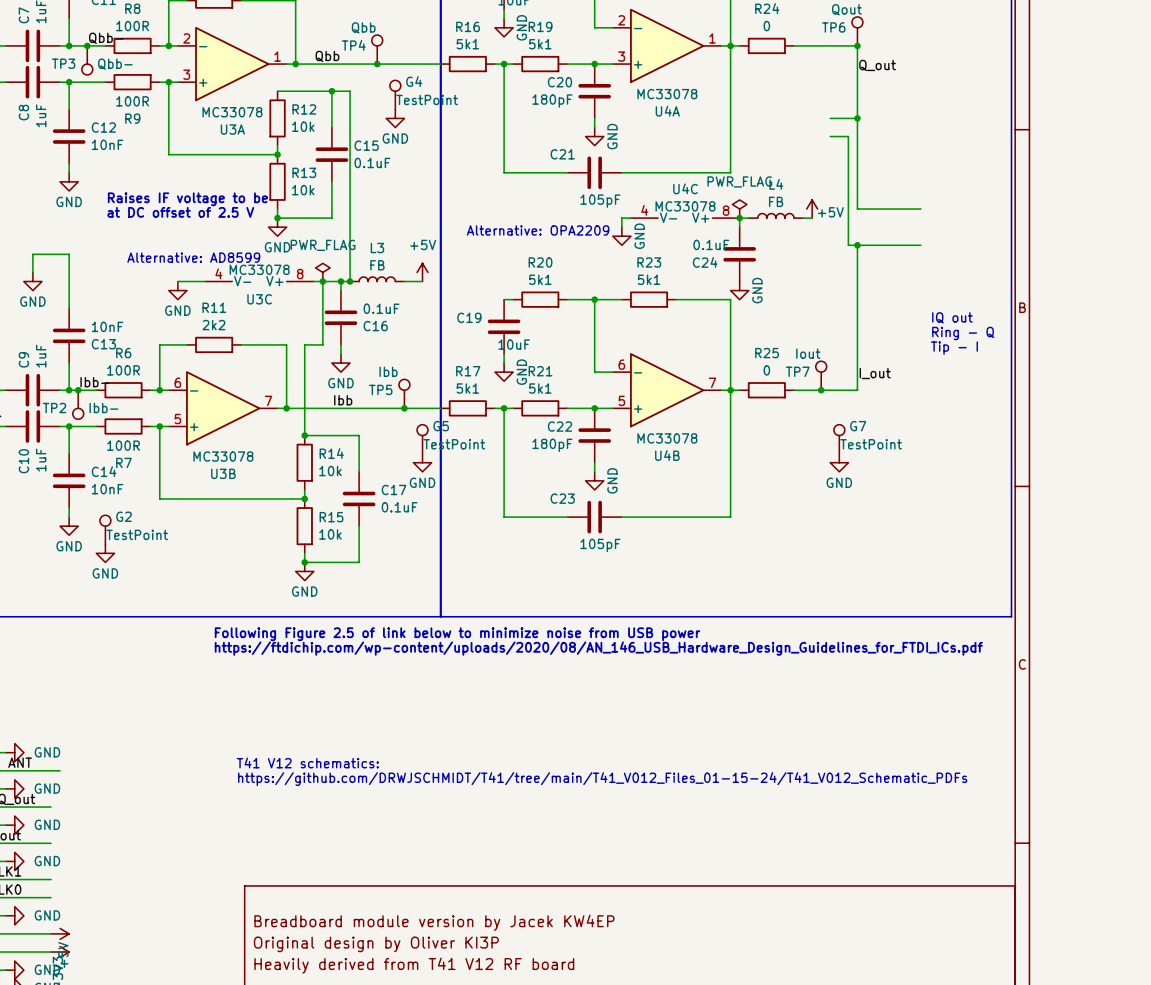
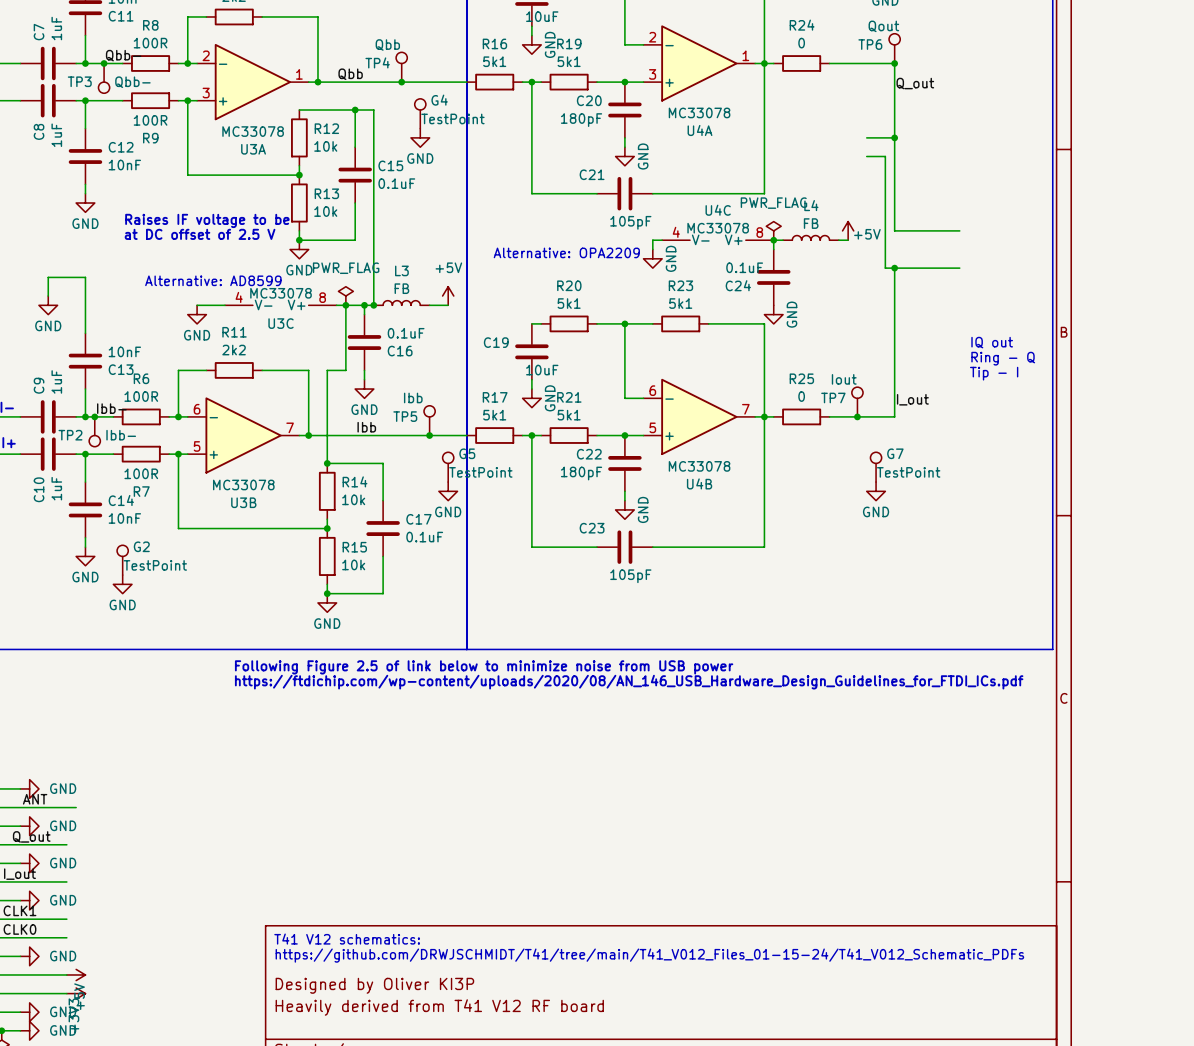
text position: T41 V12 schematics: (307, 762) -> T41 V12 schematics: (347, 939)
text position: https://github.com/DRWJSCHMIDT/T41/tree/main/T41_V012_Files_01-15-24/T41_V012_Schematic_PDFs (602, 779) -> https://github.com/DRWJSCHMIDT/T41/tree/main/T41_V012_Files_01-15-24/T41_V012_Schematic_PDFs (649, 955)
title block: Breadboard module version by Jacek KW4EP (434, 922) -> none
title block: Original design by Oliver KI3P (376, 944) -> Designed by Oliver KI3P (374, 985)

